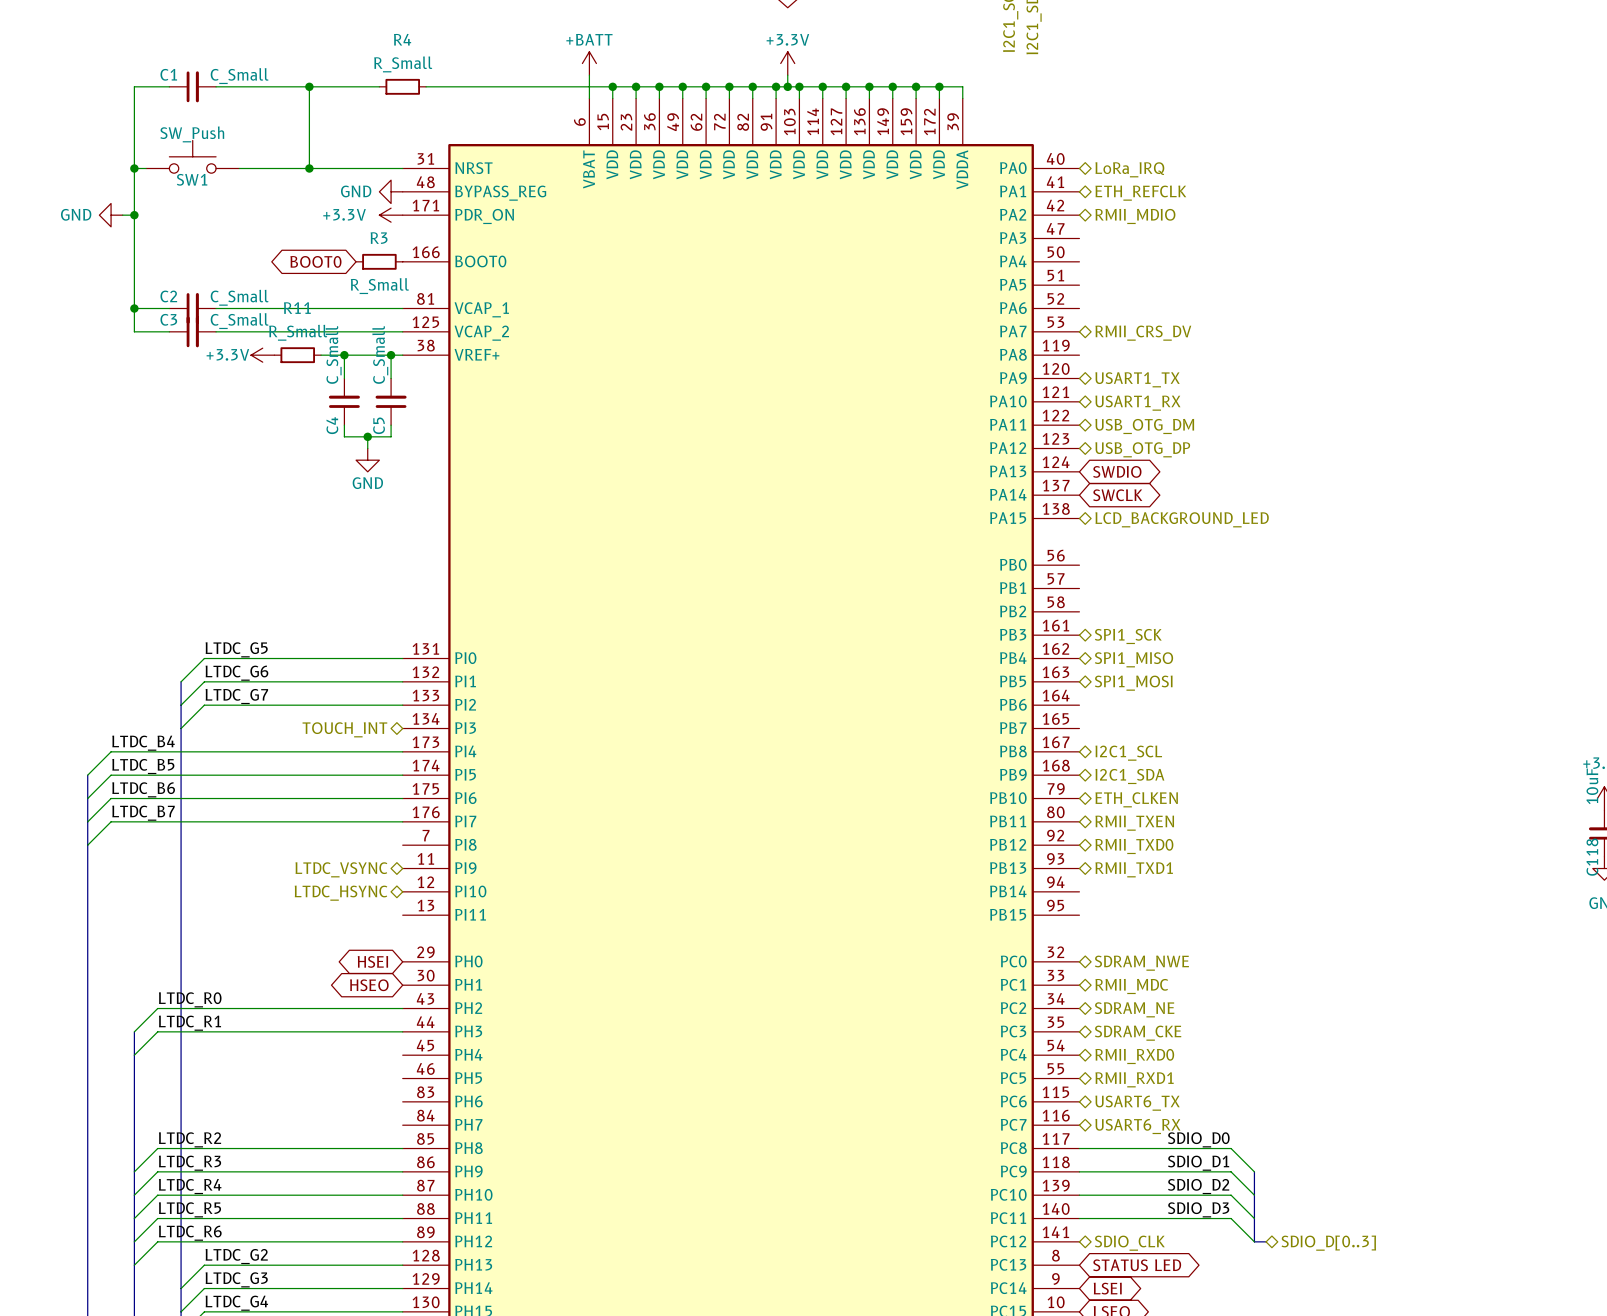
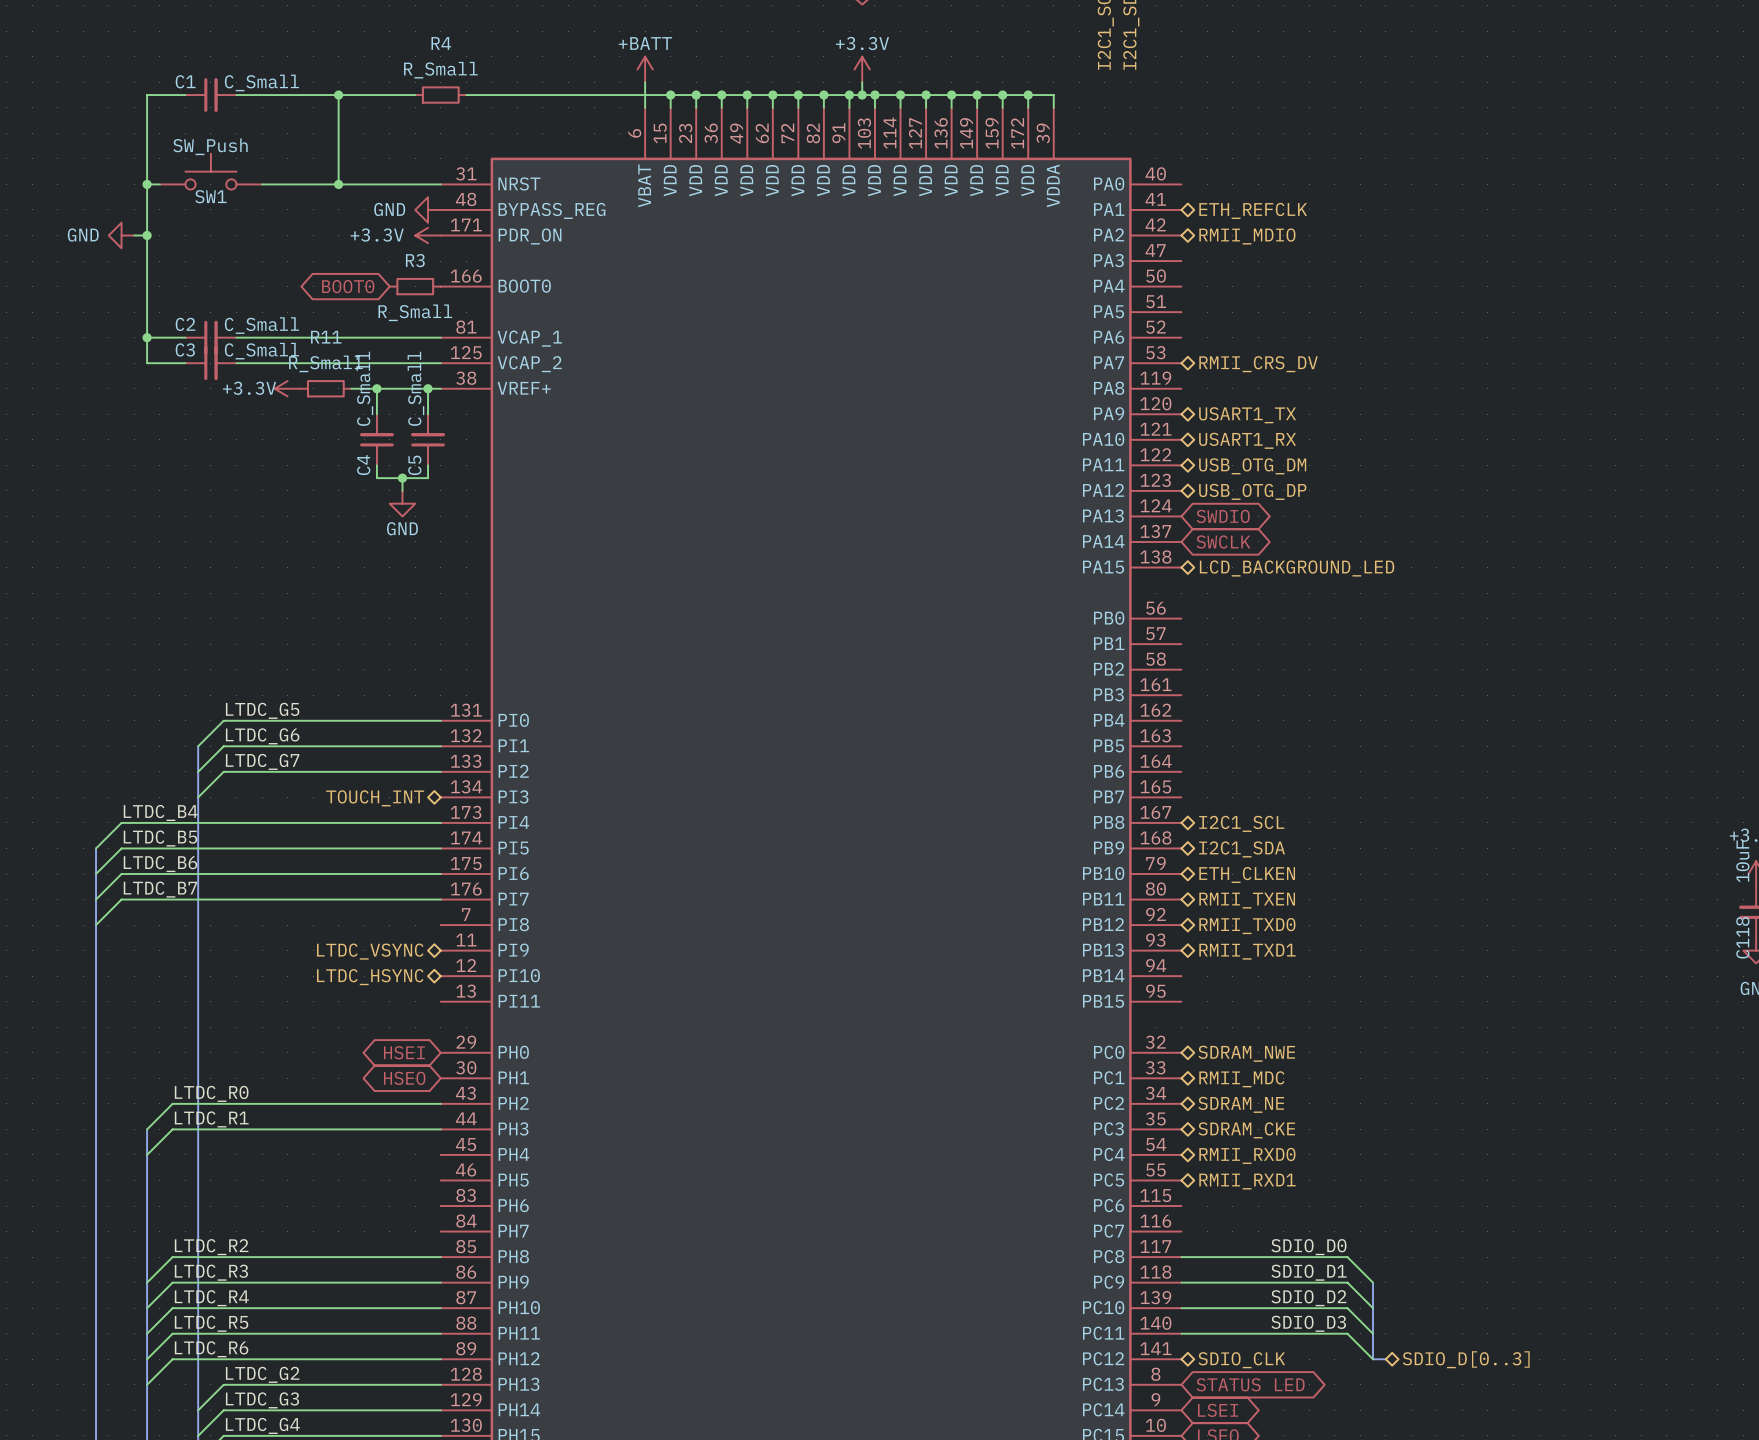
hierarchical label: LoRa_IRQ (1129, 169) -> none
hierarchical label: SPI1_SCK (1128, 636) -> none
hierarchical label: SPI1_MISO (1133, 659) -> none
hierarchical label: SPI1_MOSI (1133, 683) -> none
hierarchical label: USART6_TX (1137, 1103) -> none
hierarchical label: USART6_RX (1137, 1126) -> none

